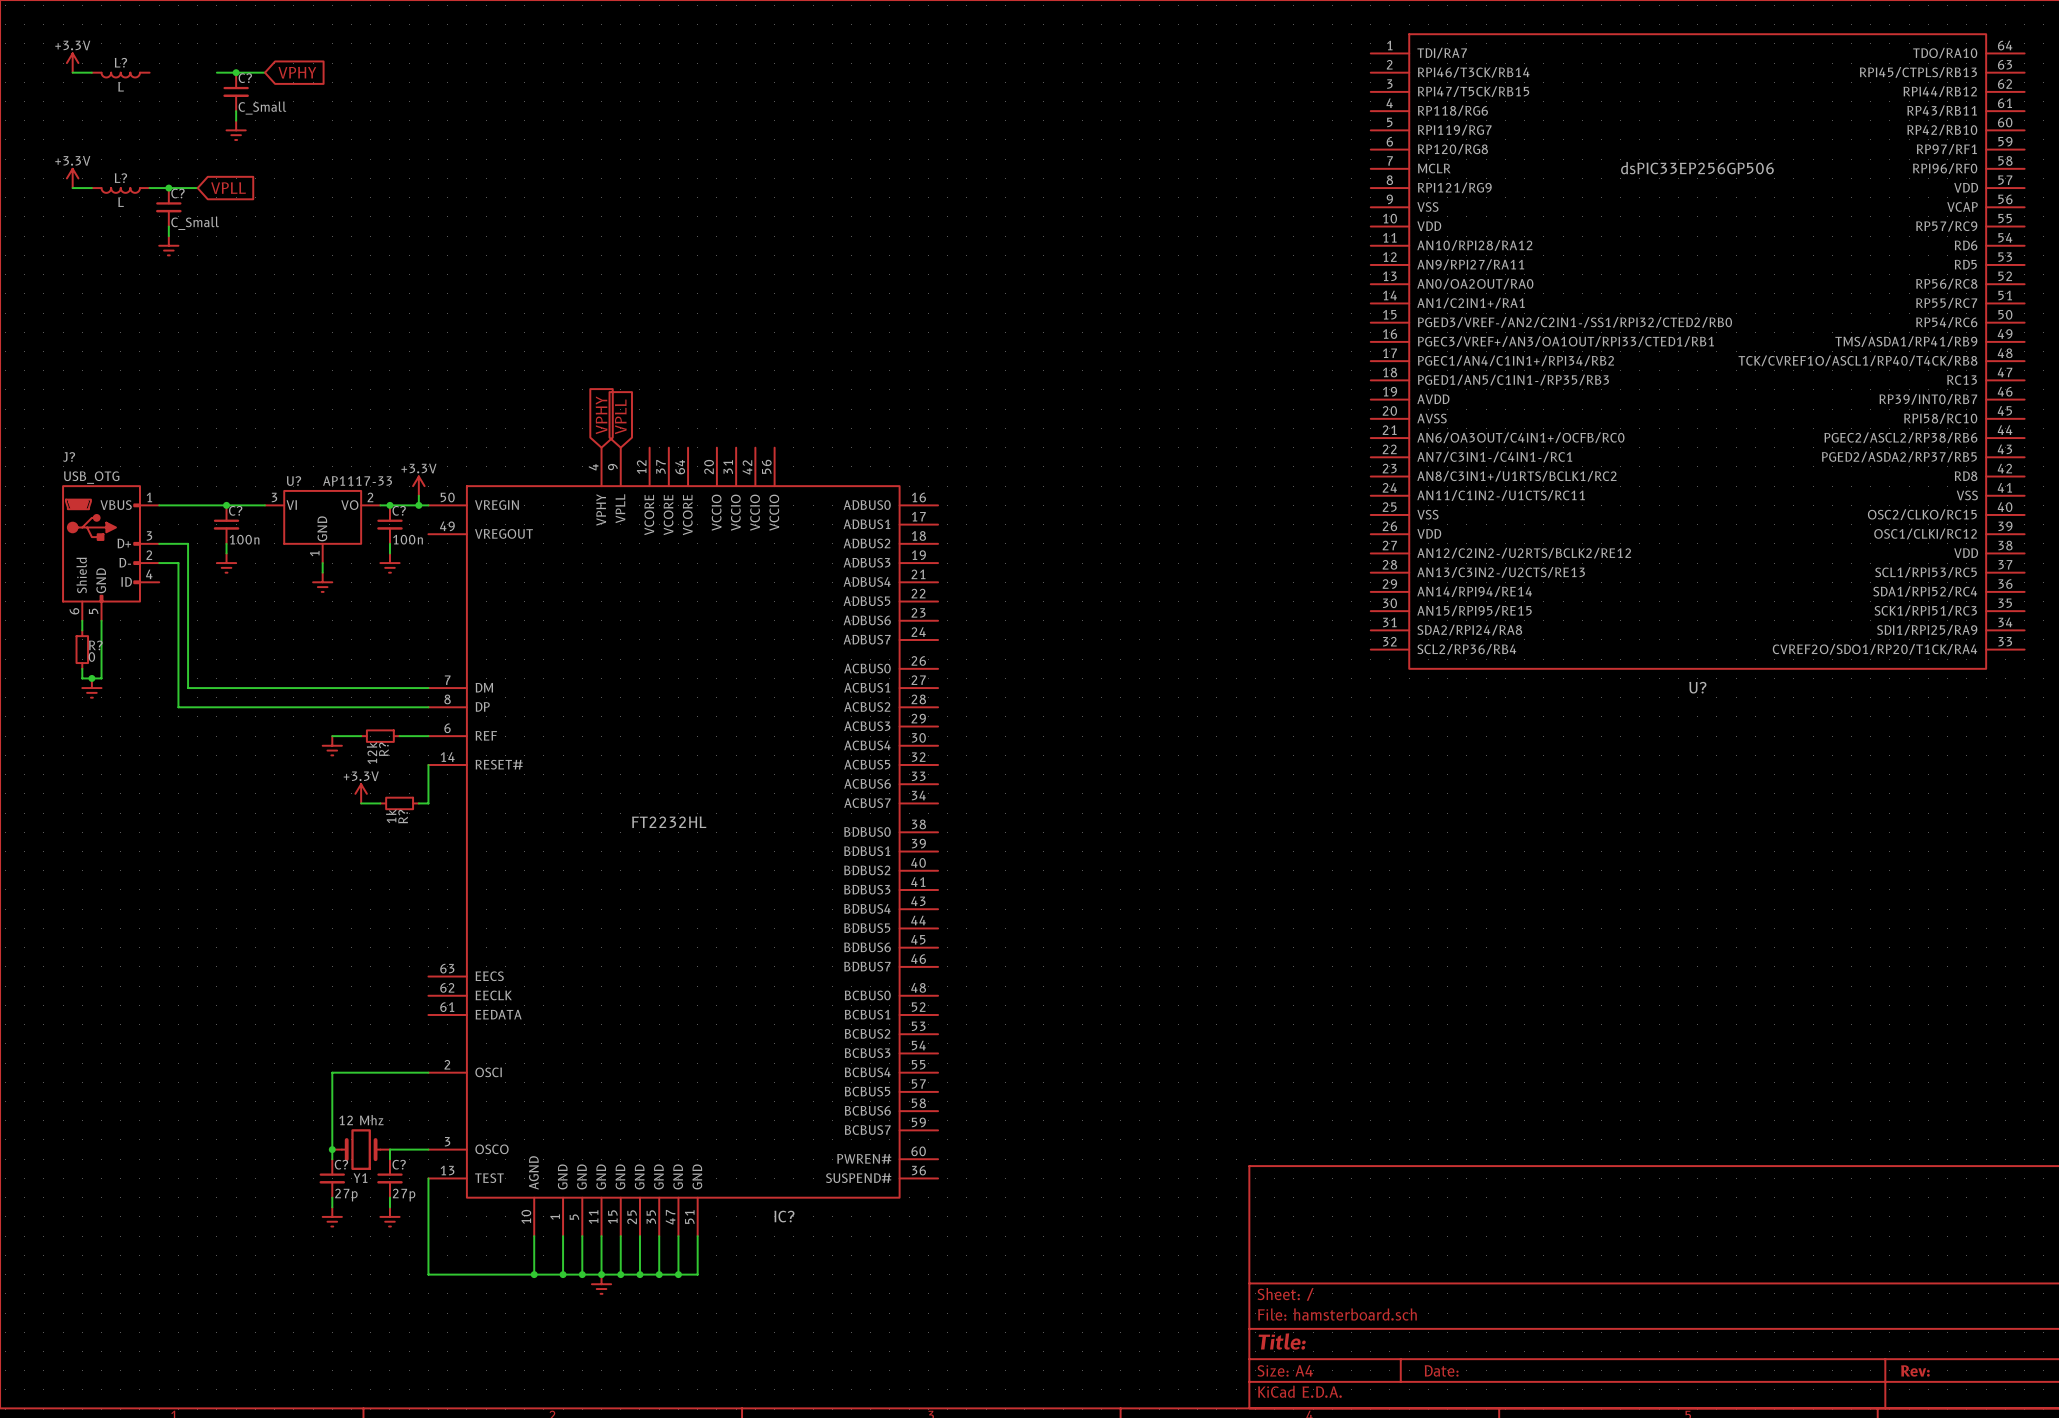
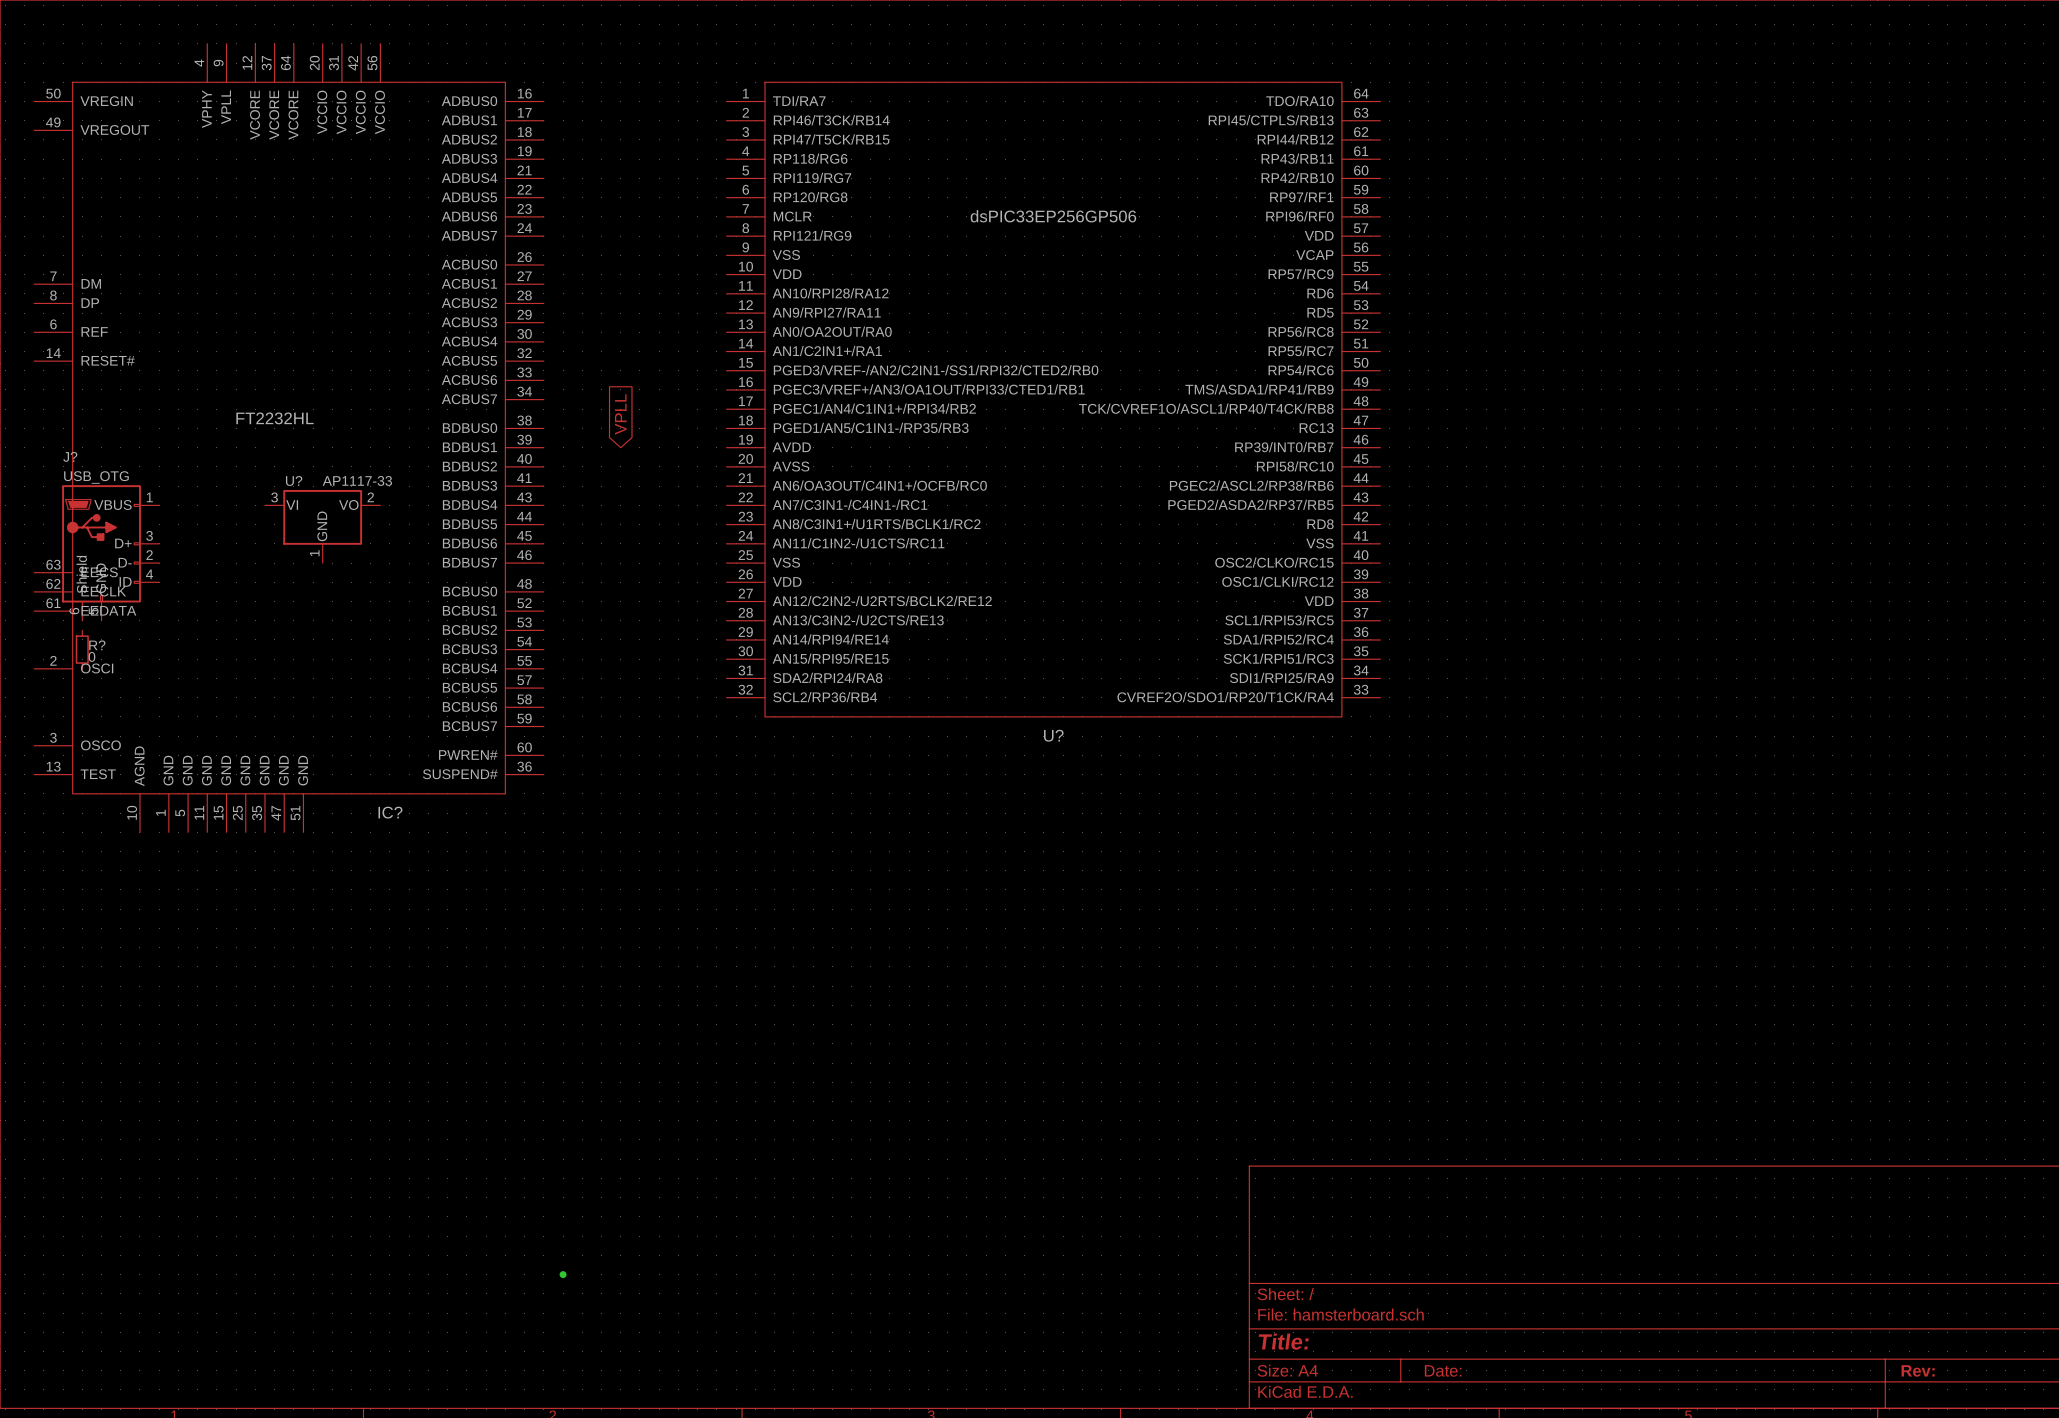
power symbol: +3.3V (72, 63) -> none
wire: (72, 72) (91, 72) -> none
wire: (216, 72) (264, 72) -> none
junction: (236, 72) -> none
global label: VPHY (297, 72) -> none
L?: L (120, 75) -> none
C?: C_Small (236, 91) -> none
wire: (236, 111) (236, 120) -> none
power symbol: (236, 130) -> none
power symbol: +3.3V (72, 178) -> none
wire: (72, 188) (91, 188) -> none
wire: (149, 188) (197, 188) -> none
junction: (168, 188) -> none
global label: VPLL (228, 188) -> none
L?: L (120, 190) -> none
C?: C_Small (168, 207) -> none
wire: (168, 226) (168, 236) -> none
power symbol: (168, 245) -> none
U?: dsPIC33EP256GP506 (1697, 351) -> none
U?: none -> dsPIC33EP256GP506 (1053, 399)
global label: VPHY (601, 415) -> none
IC?: none -> FT2232HL (289, 438)
power symbol: +3.3V (418, 486) -> none
wire: (418, 495) (418, 505) -> none
wire: (159, 505) (264, 505) -> none
junction: (226, 505) -> none
wire: (380, 505) (428, 505) -> none
junction: (389, 505) -> none
junction: (418, 505) -> none
C?: 100n (226, 524) -> none
C?: 100n (389, 524) -> none
wire: (159, 543) (188, 543) (188, 688) (428, 688) -> none
wire: (226, 543) (226, 553) -> none
wire: (389, 543) (389, 553) -> none
wire: (159, 563) (178, 563) (178, 707) (428, 707) -> none
power symbol: (226, 563) -> none
wire: (322, 563) (322, 572) -> none
power symbol: (389, 563) -> none
power symbol: (322, 582) -> none
wire: (82, 620) (82, 630) -> none
wire: (101, 620) (101, 678) (82, 678) (82, 668) -> none
junction: (91, 678) -> none
power symbol: (91, 688) -> none
wire: (332, 736) (361, 736) -> none
R?: 12k (380, 736) -> none
wire: (399, 736) (428, 736) -> none
power symbol: (332, 745) -> none
wire: (428, 764) (428, 803) (418, 803) -> none
power symbol: +3.3V (361, 793) -> none
wire: (361, 803) (380, 803) -> none
R?: 1k (399, 803) -> none
IC?: FT2232HL (683, 841) -> none
wire: (428, 1072) (332, 1072) (332, 1159) -> none
junction: (332, 1149) -> none
Y1: 12 Mhz (361, 1149) -> none
wire: (428, 1149) (389, 1149) (389, 1159) -> none
C?: 27p (332, 1178) -> none
C?: 27p (389, 1178) -> none
wire: (428, 1178) (428, 1274) (697, 1274) (697, 1236) -> none
wire: (332, 1197) (332, 1207) -> none
wire: (389, 1197) (389, 1207) -> none
power symbol: (332, 1216) -> none
power symbol: (389, 1216) -> none
wire: (534, 1236) (534, 1274) -> none
wire: (563, 1236) (563, 1274) -> none
wire: (582, 1236) (582, 1274) -> none
wire: (601, 1236) (601, 1274) -> none
wire: (620, 1236) (620, 1274) -> none
wire: (639, 1236) (639, 1274) -> none
wire: (659, 1236) (659, 1274) -> none
wire: (678, 1236) (678, 1274) -> none
junction: (534, 1274) -> none
junction: (582, 1274) -> none
junction: (601, 1274) -> none
junction: (620, 1274) -> none
junction: (639, 1274) -> none
junction: (659, 1274) -> none
junction: (678, 1274) -> none
power symbol: (601, 1284) -> none

